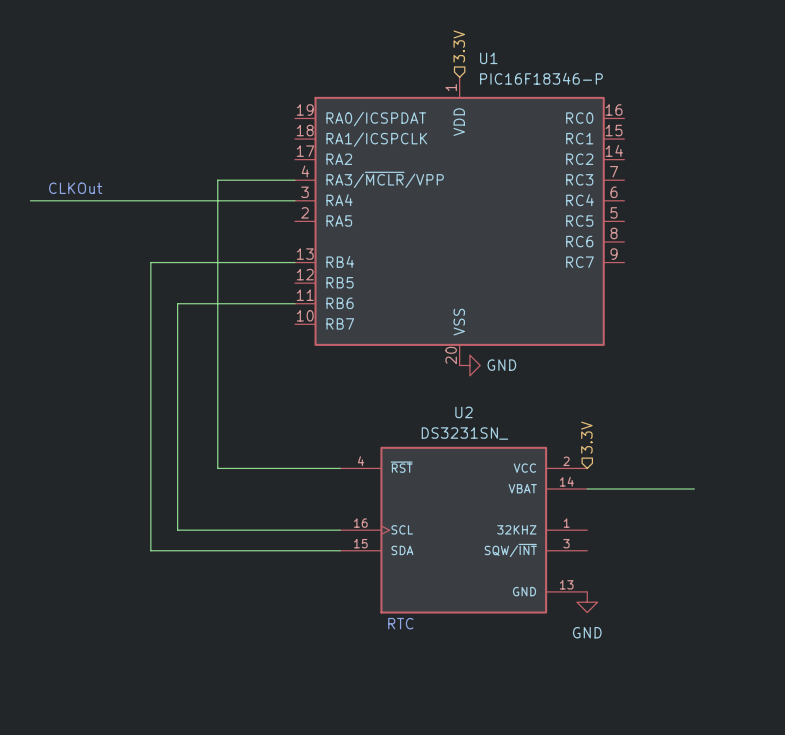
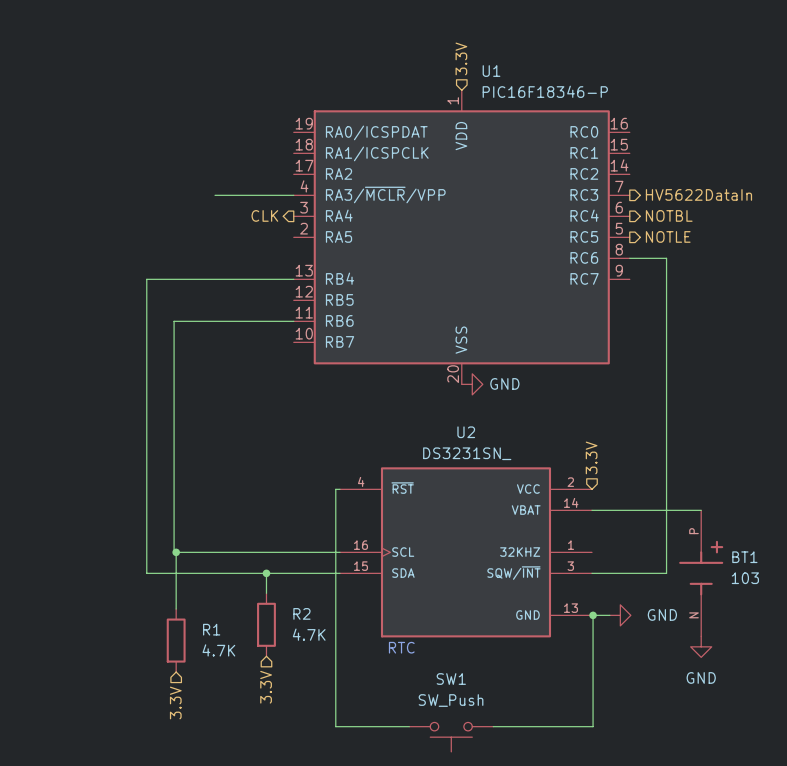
hierarchical label: none -> HV5622DataIn (698, 194)
wire: (217, 180) (217, 468) (336, 468) -> (409, 726) (335, 726) (335, 489)
text: CLKOut (75, 188) -> none
wire: (30, 200) (294, 200) -> none
hierarchical label: none -> CLK (264, 215)
hierarchical label: none -> NOTBL (669, 215)
hierarchical label: none -> NOTLE (668, 236)
wire: none -> (629, 258) (666, 258) (666, 573) (591, 573)
wire: none -> (176, 552) (176, 609)
junction: none -> (176, 552)
wire: none -> (266, 573) (266, 593)
junction: none -> (266, 573)
BT1: none -> 103 (701, 573)
wire: none -> (591, 615) (609, 615)
wire: none -> (593, 615) (593, 726) (493, 726)
junction: none -> (593, 615)
R2: none -> 4.7K (266, 624)
power symbol rotation: 0° (587, 602) -> 90° counterclockwise (620, 615)
power symbol position: GND (587, 602) -> GND (620, 615)
R1: none -> 4.7K (176, 640)
power symbol: none -> GND (701, 646)
hierarchical label: none -> 3.3V (266, 687)
hierarchical label: none -> 3.3V (175, 702)
SW1: none -> SW_Push (451, 737)

